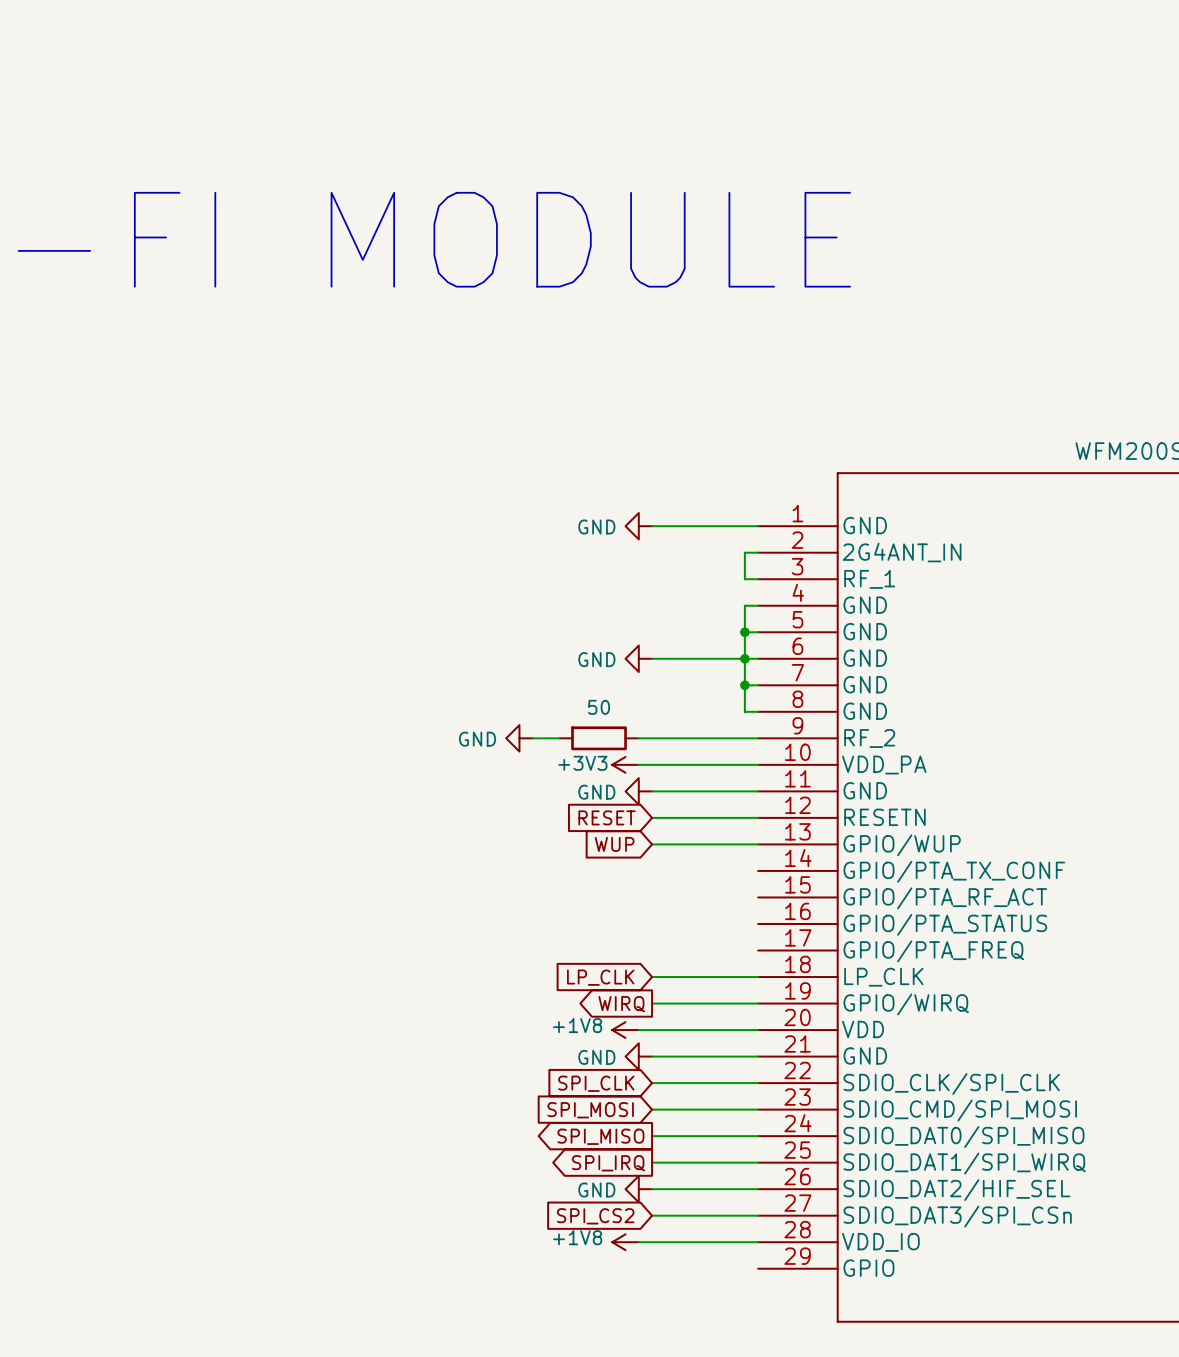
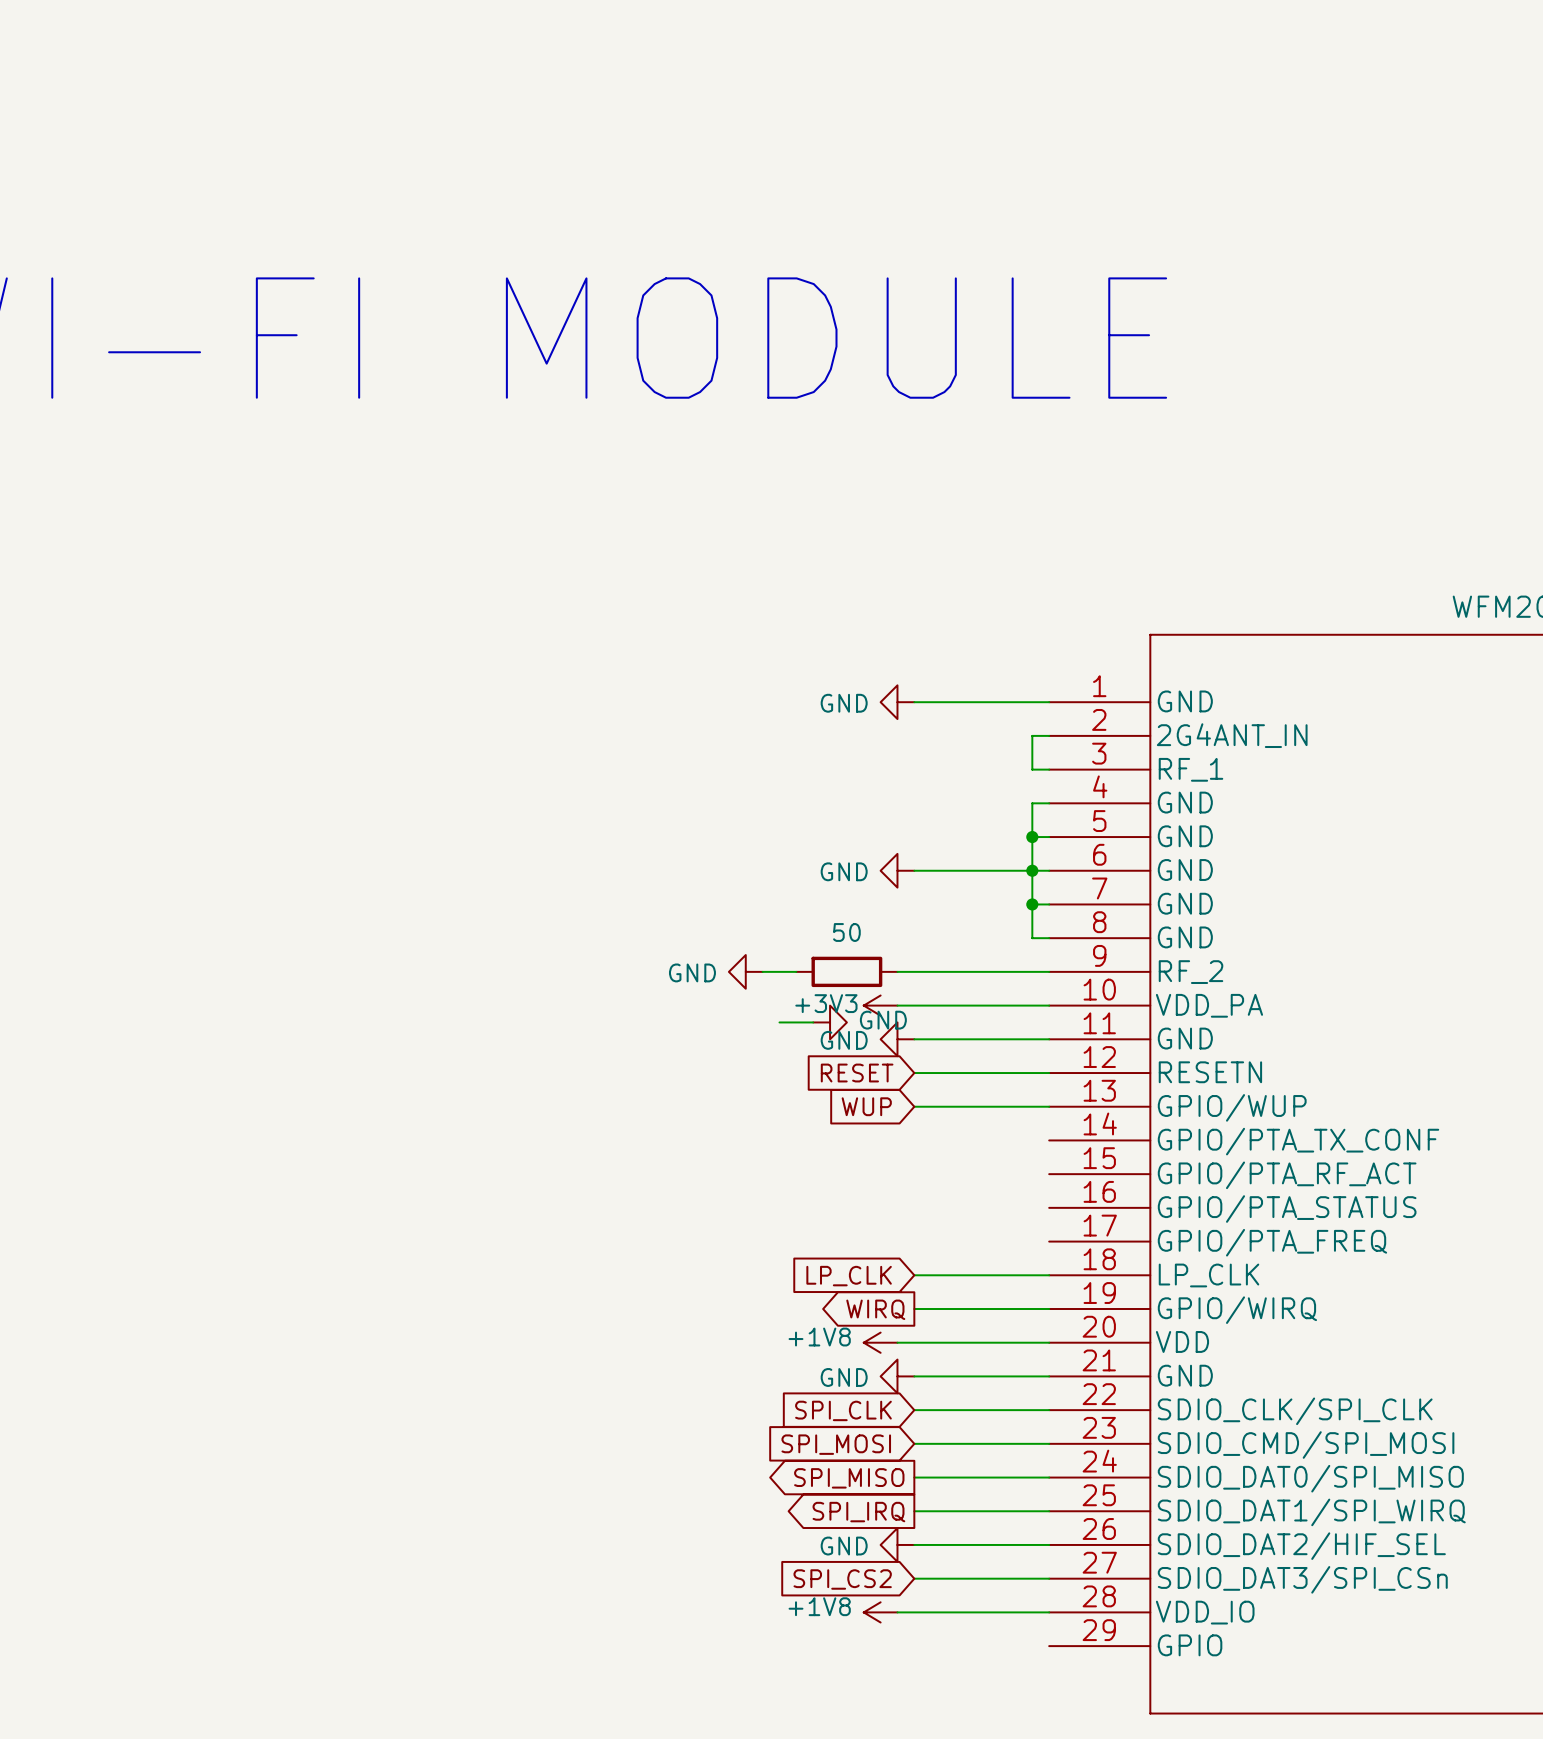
wire: none -> (779, 1022) (813, 1022)
power symbol: none -> GND (830, 1022)

